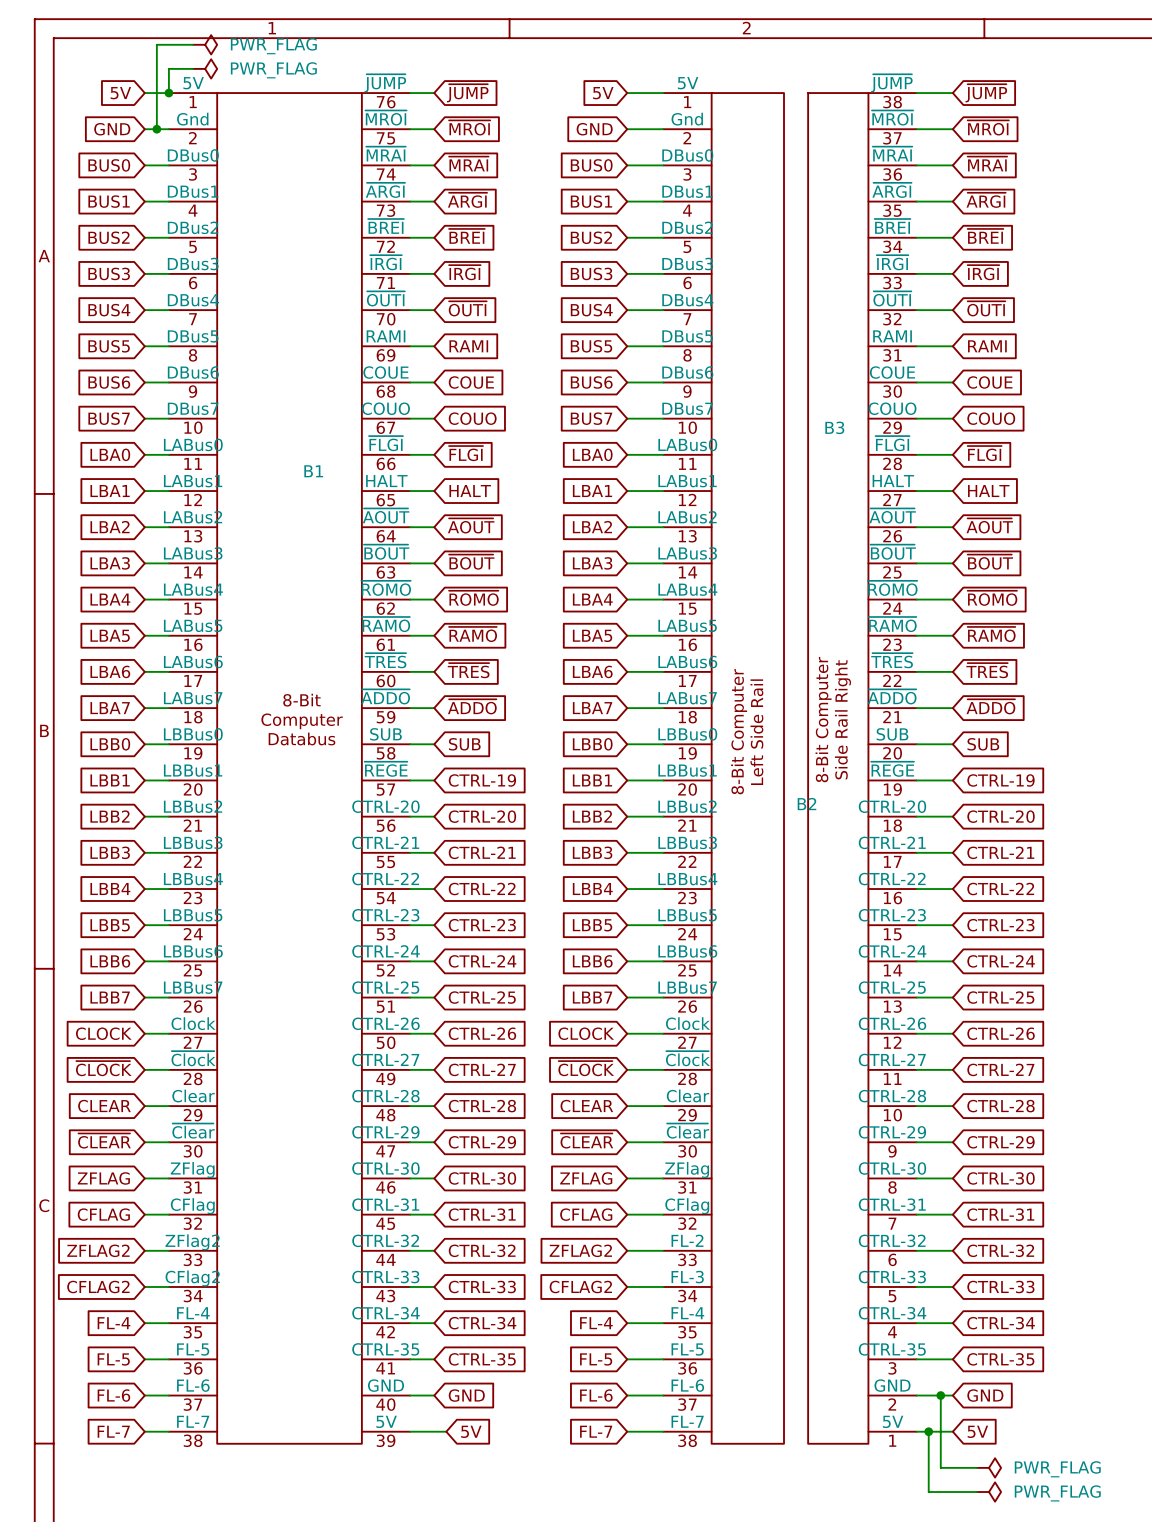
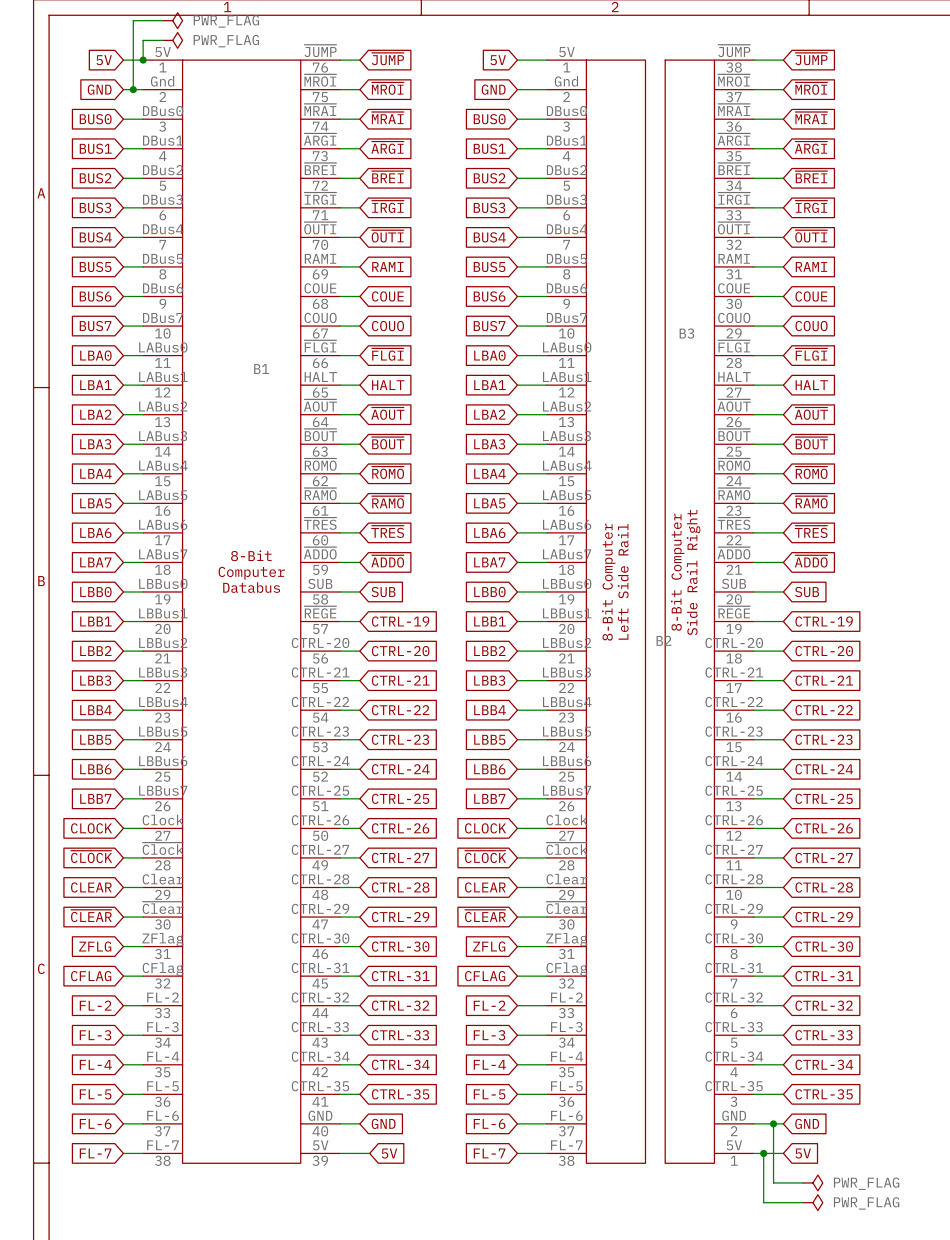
global label: ZFLAG (103, 1178) -> ZFLG (95, 946)
global label: ZFLAG (586, 1178) -> ZFLG (489, 946)
B1 pin name: ZFlag2 (192, 1242) -> FL-2 (163, 997)
global label: ZFLAG2 (98, 1250) -> FL-2 (95, 1005)
global label: ZFLAG2 (580, 1250) -> FL-2 (489, 1005)
B1 pin name: CFlag2 (192, 1278) -> FL-3 (162, 1027)
global label: CFLAG2 (98, 1287) -> FL-3 (95, 1035)
global label: CFLAG2 (580, 1287) -> FL-3 (489, 1035)

